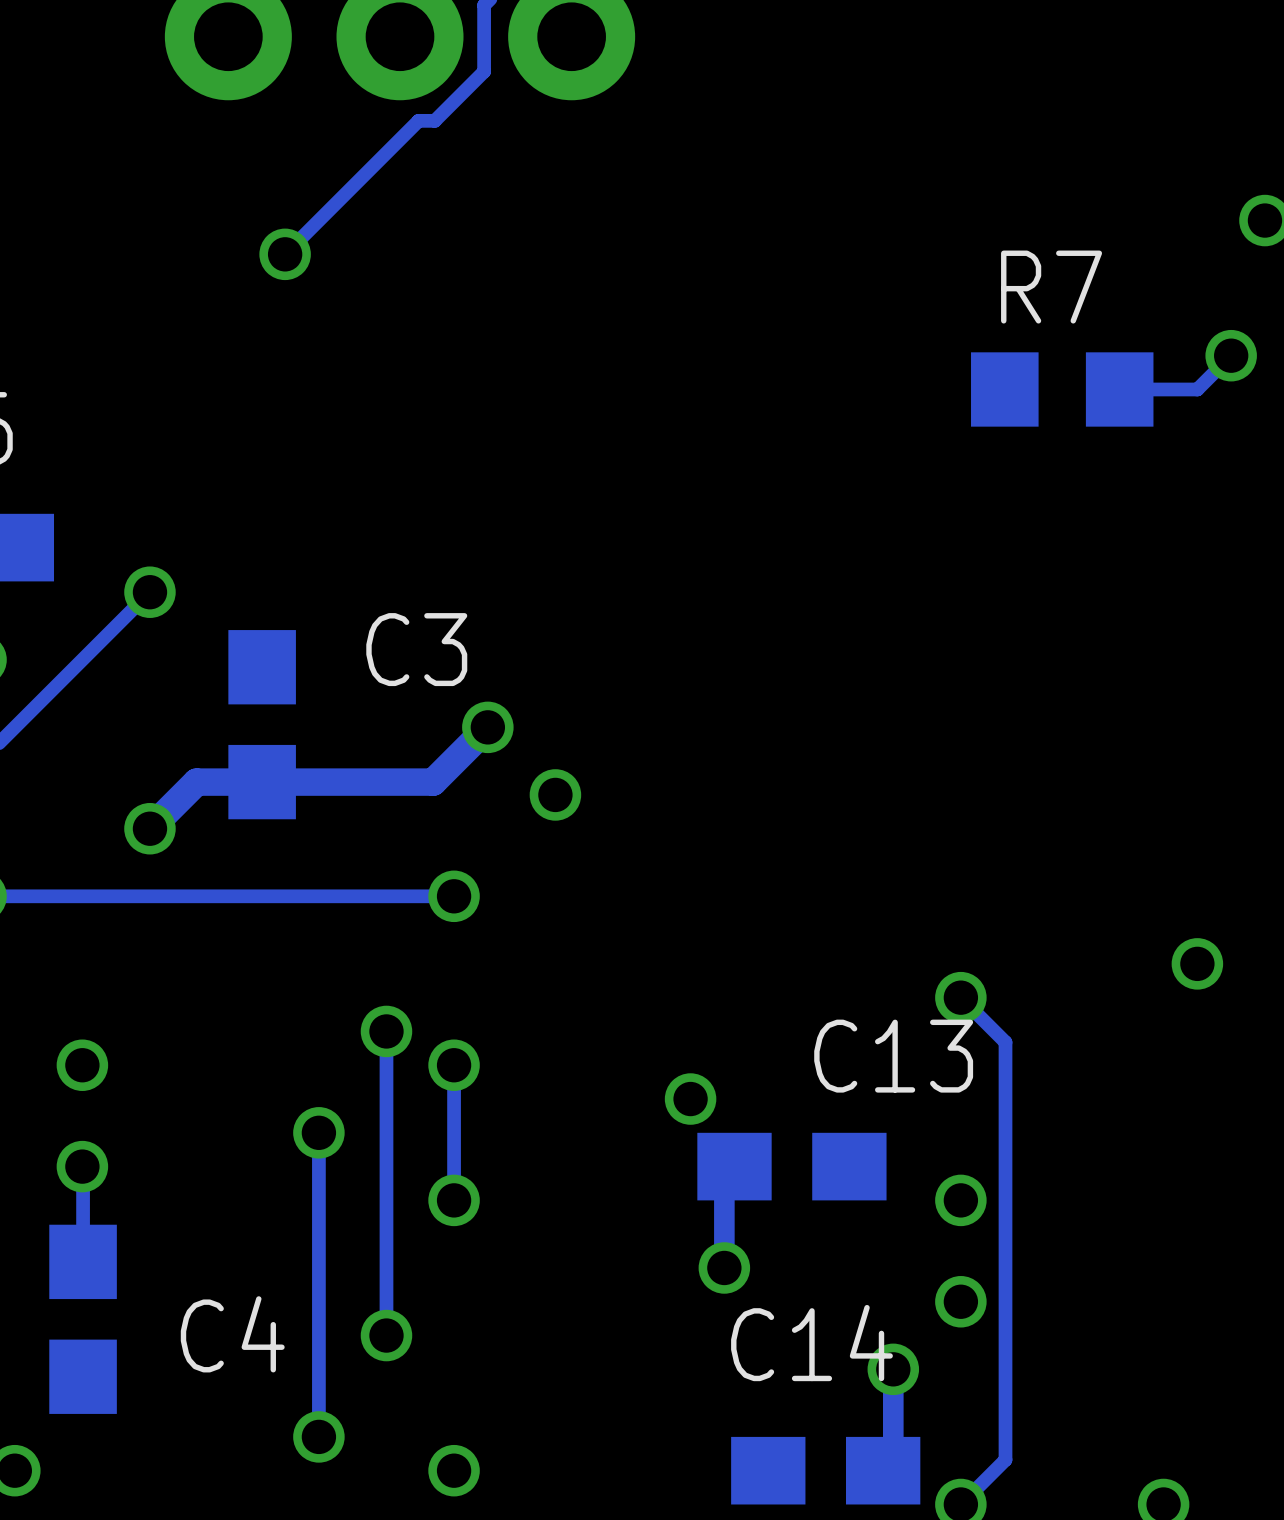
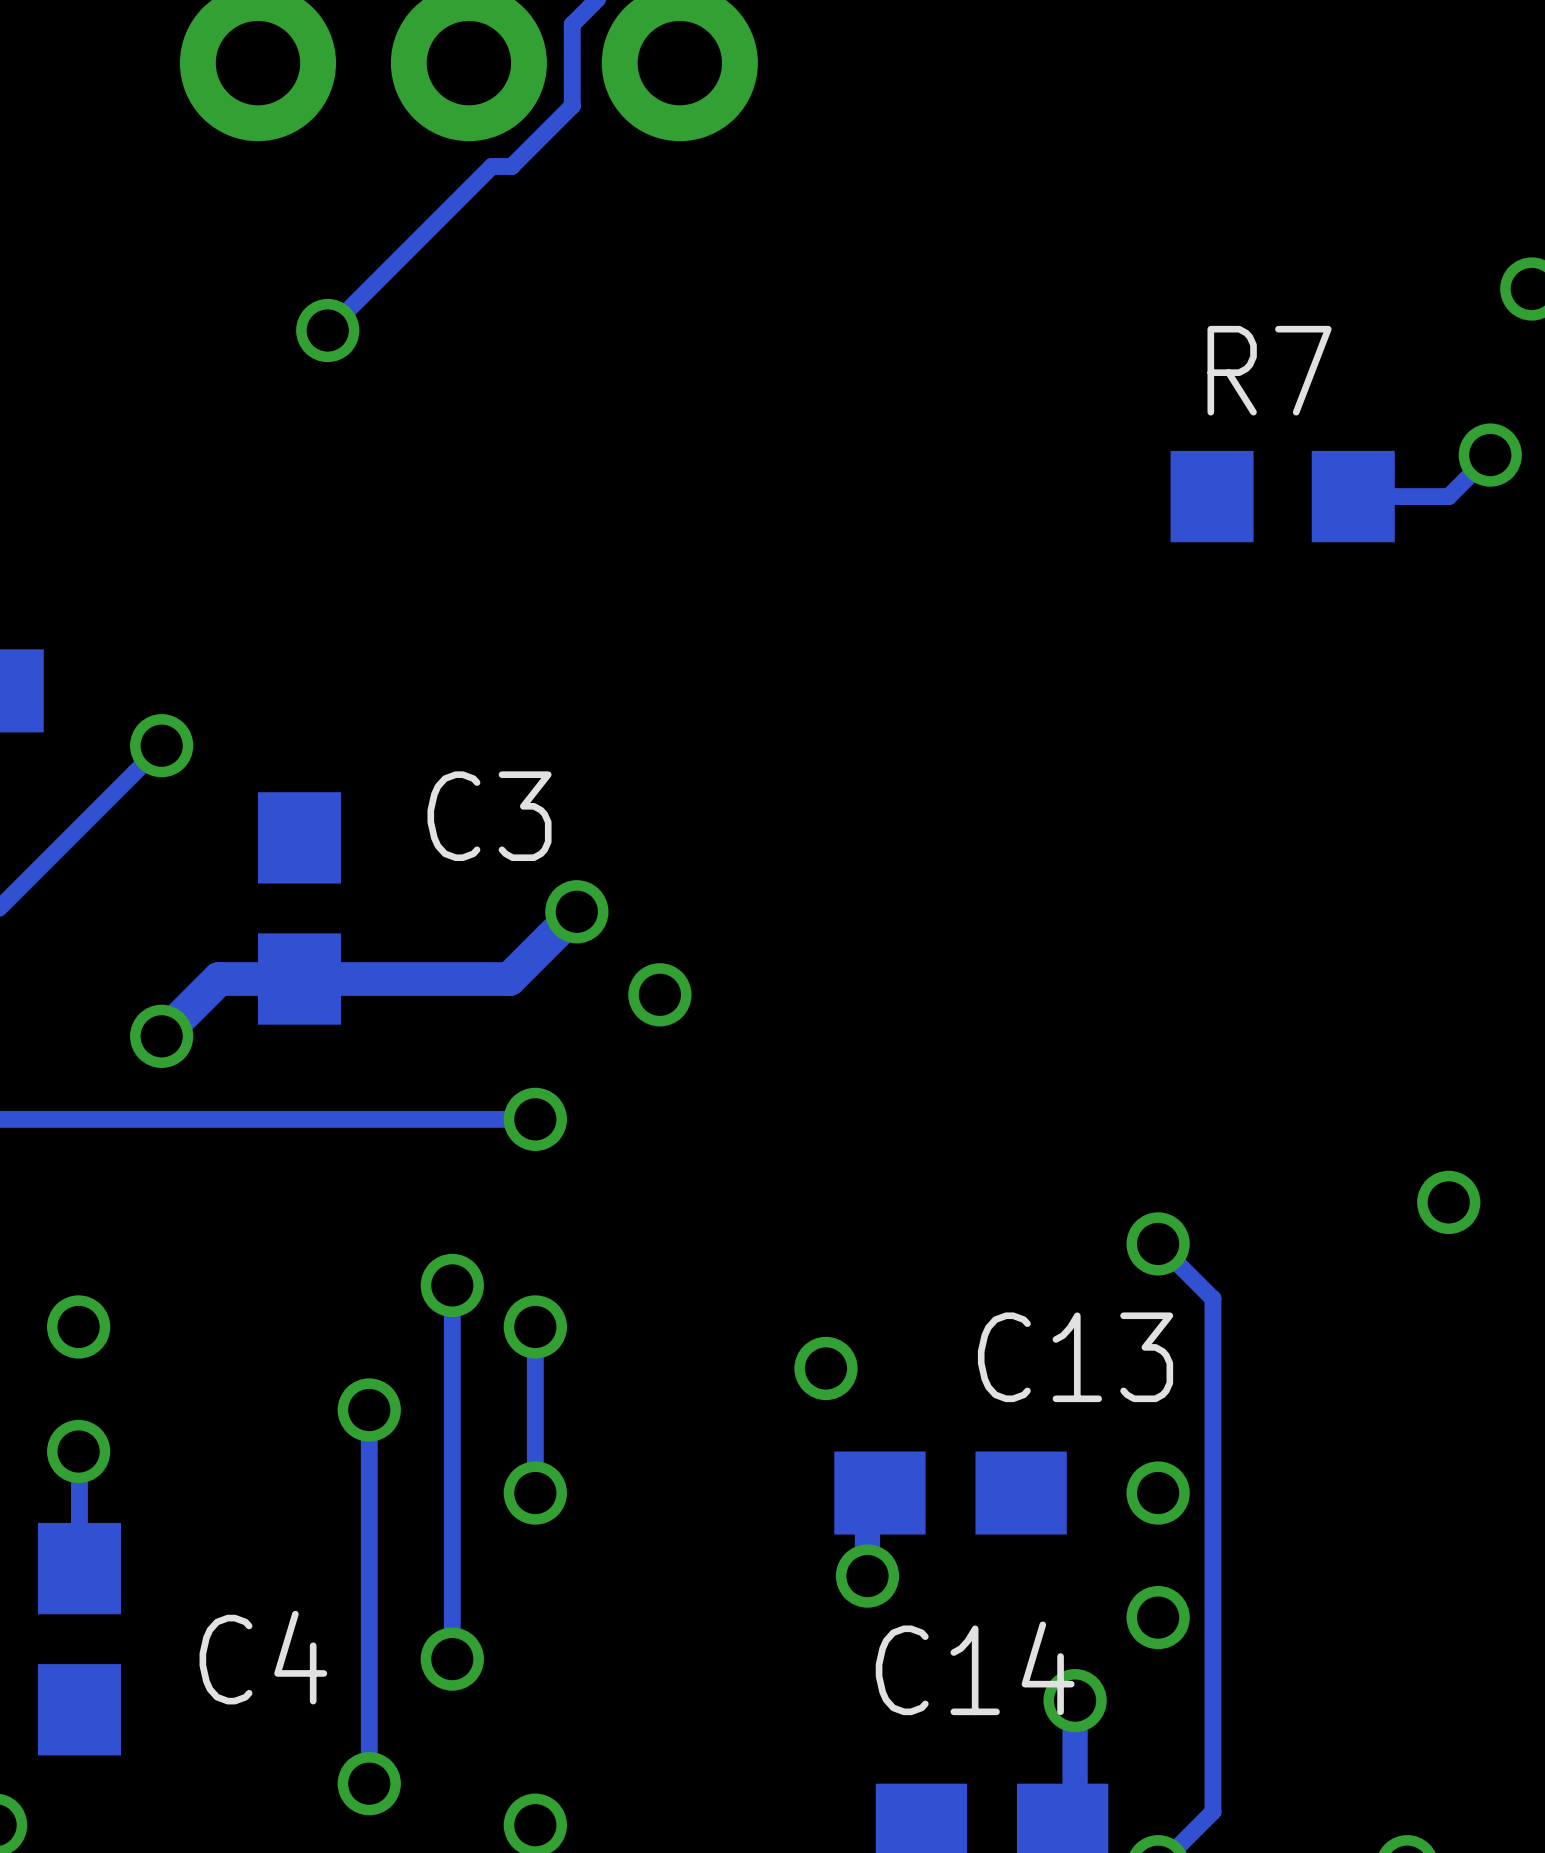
C13 position: (791, 1166) -> (950, 1493)

